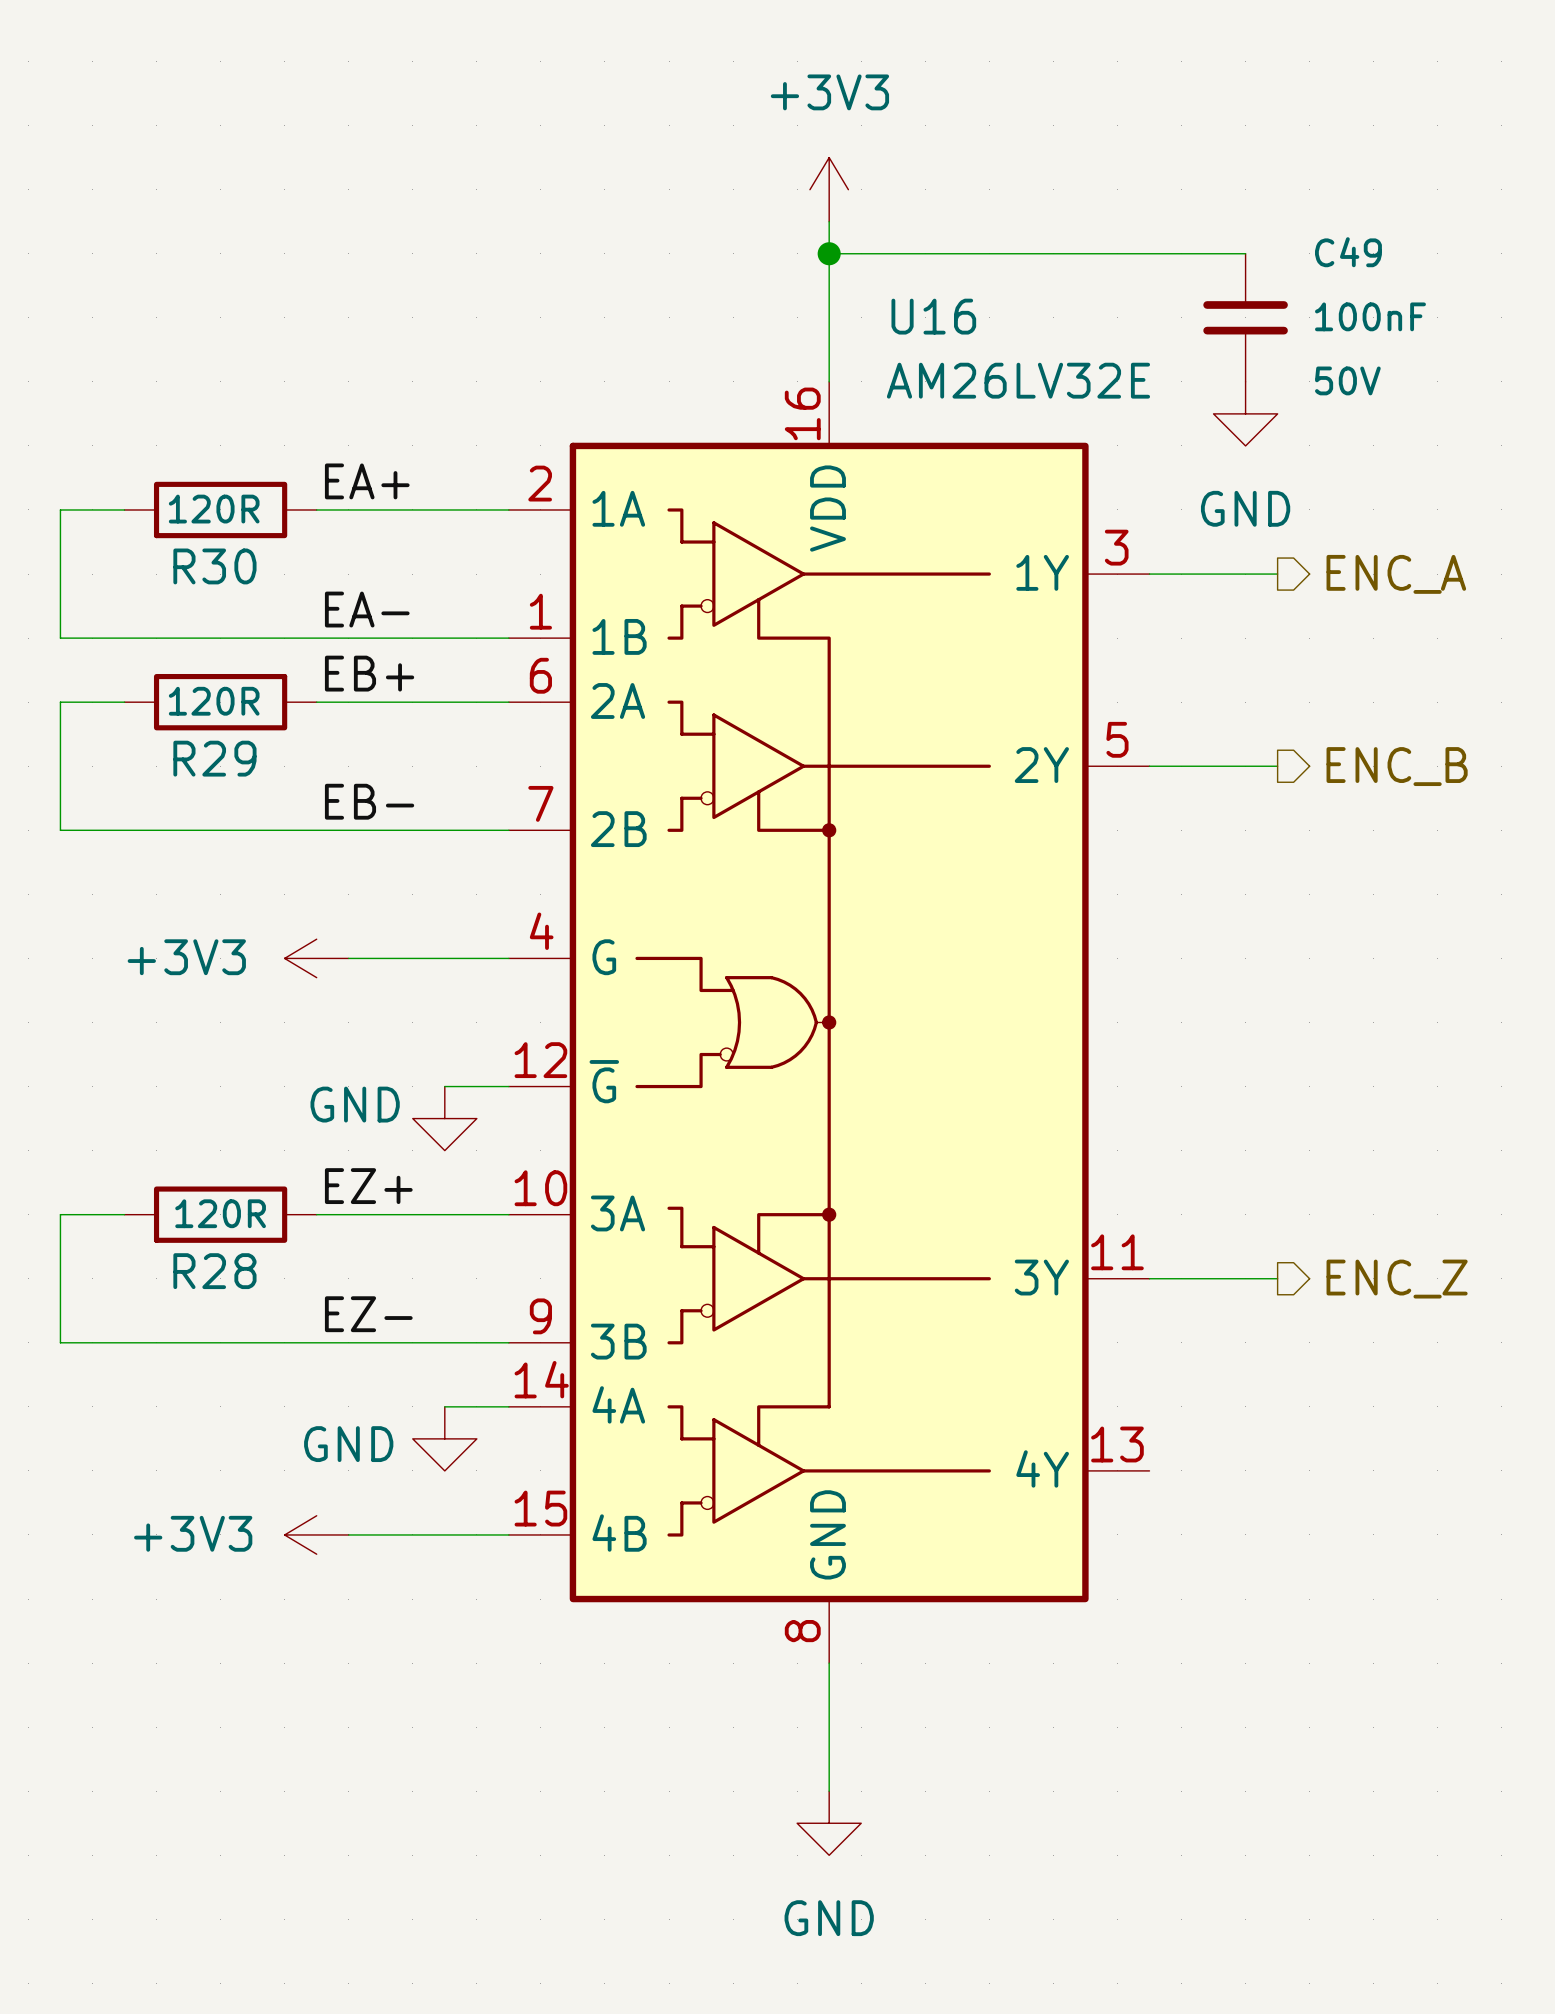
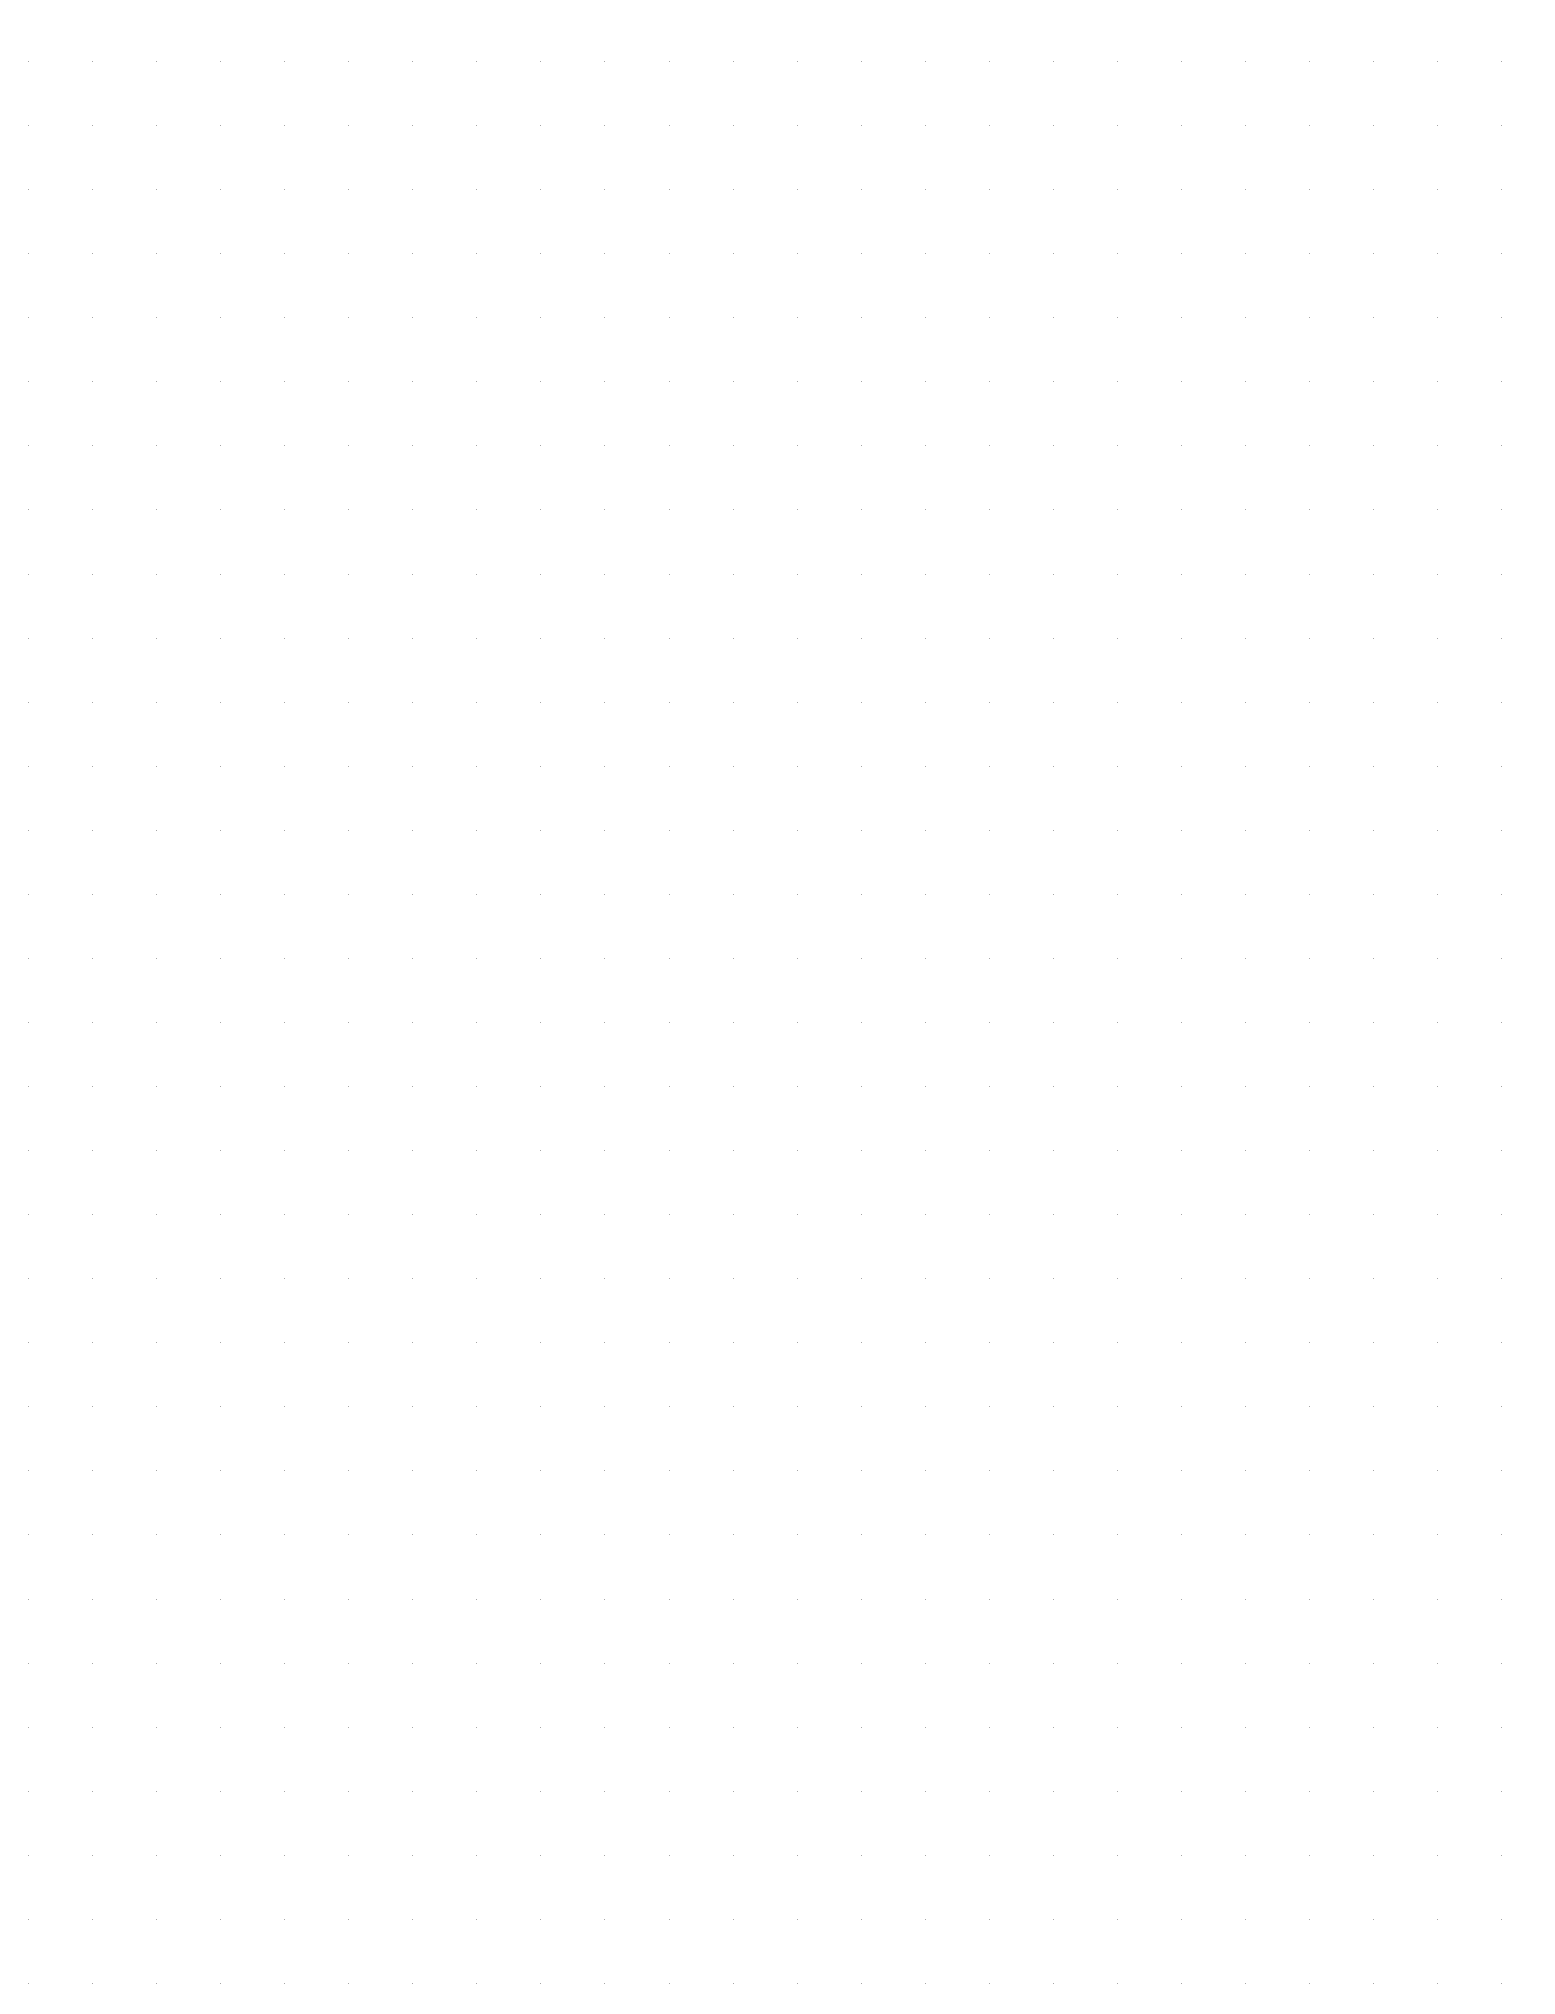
power symbol: +3V3 (829, 189) -> none
wire: (829, 221) (829, 381) -> none
wire: (829, 253) (1245, 253) -> none
junction: (829, 253) -> none
C49: (1245, 317) -> none
power symbol: GND (1245, 413) -> none
label: EA+ (367, 481) -> none
wire: (124, 509) (60, 509) (60, 638) (508, 638) -> none
R30: (220, 509) -> none
wire: (316, 509) (508, 509) -> none
wire: (1149, 574) (1277, 574) -> none
hierarchical label: ENC_A (1396, 574) -> none
label: EA- (367, 609) -> none
label: EB+ (369, 673) -> none
wire: (124, 702) (60, 702) (60, 830) (508, 830) -> none
R29: (220, 702) -> none
wire: (316, 702) (508, 702) -> none
wire: (1149, 766) (1277, 766) -> none
hierarchical label: ENC_B (1397, 766) -> none
label: EB- (369, 801) -> none
power symbol: +3V3 (316, 958) -> none
wire: (348, 958) (508, 958) -> none
U16: AM26LV32E (829, 1022) -> none
wire: (444, 1086) (508, 1086) -> none
power symbol: GND (444, 1118) -> none
label: EZ+ (368, 1186) -> none
wire: (124, 1214) (60, 1214) (60, 1342) (508, 1342) -> none
R28: (220, 1214) -> none
wire: (316, 1214) (508, 1214) -> none
wire: (1149, 1278) (1277, 1278) -> none
hierarchical label: ENC_Z (1397, 1279) -> none
label: EZ- (368, 1314) -> none
wire: (444, 1406) (508, 1406) -> none
power symbol: GND (444, 1438) -> none
power symbol: +3V3 (316, 1534) -> none
wire: (348, 1534) (508, 1534) -> none
wire: (829, 1663) (829, 1791) -> none
power symbol: GND (829, 1823) -> none

